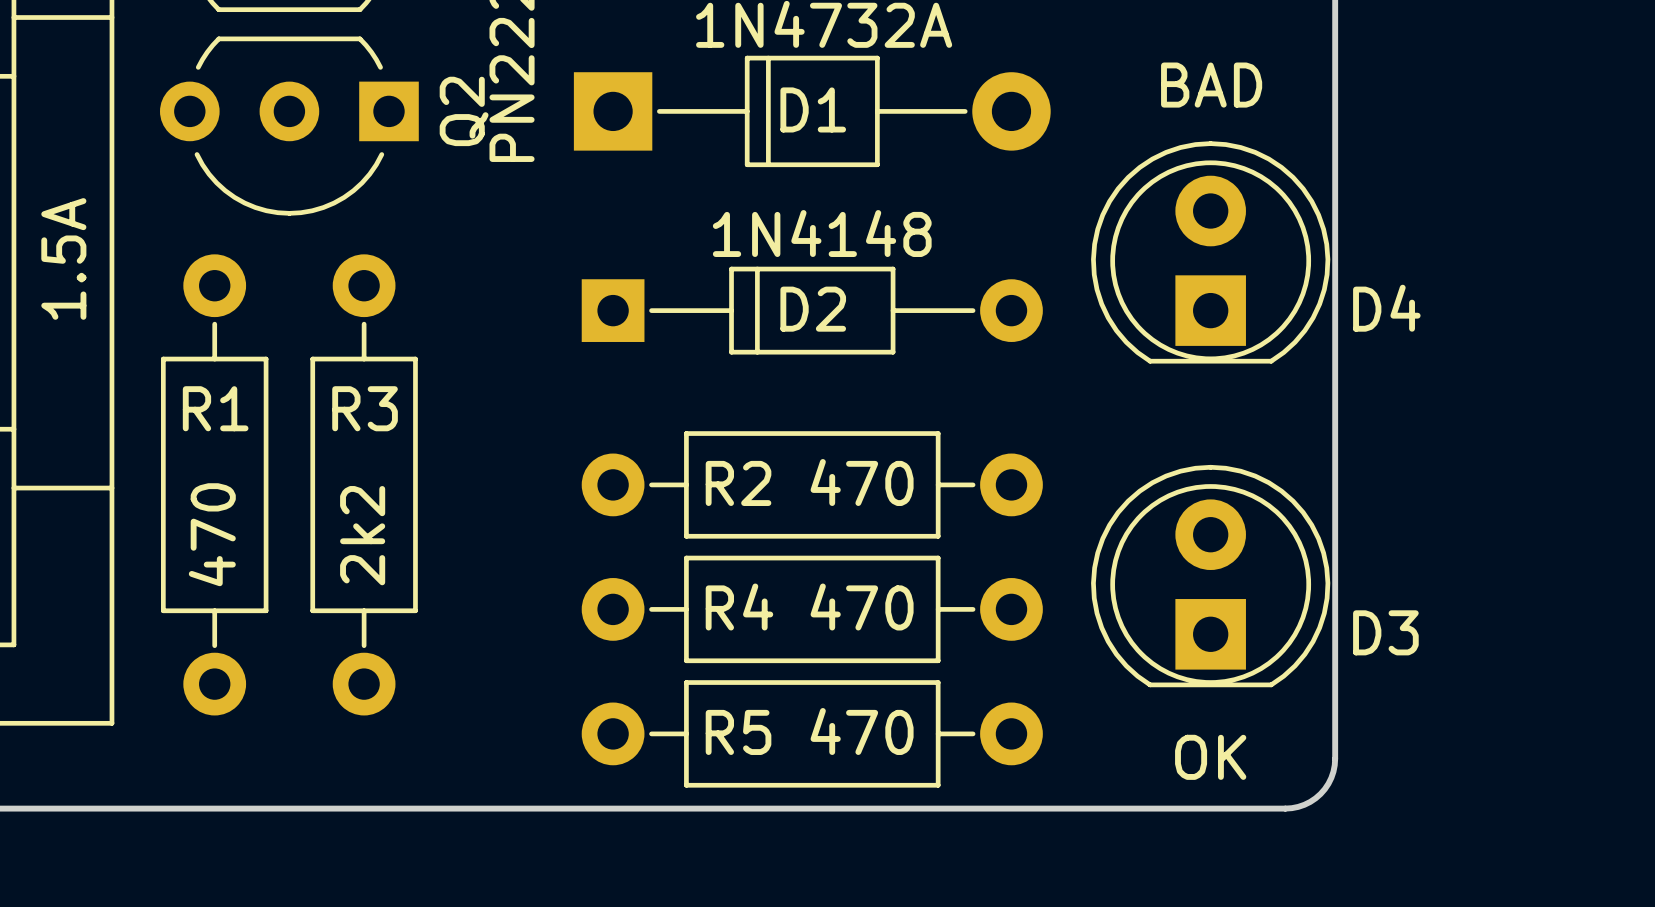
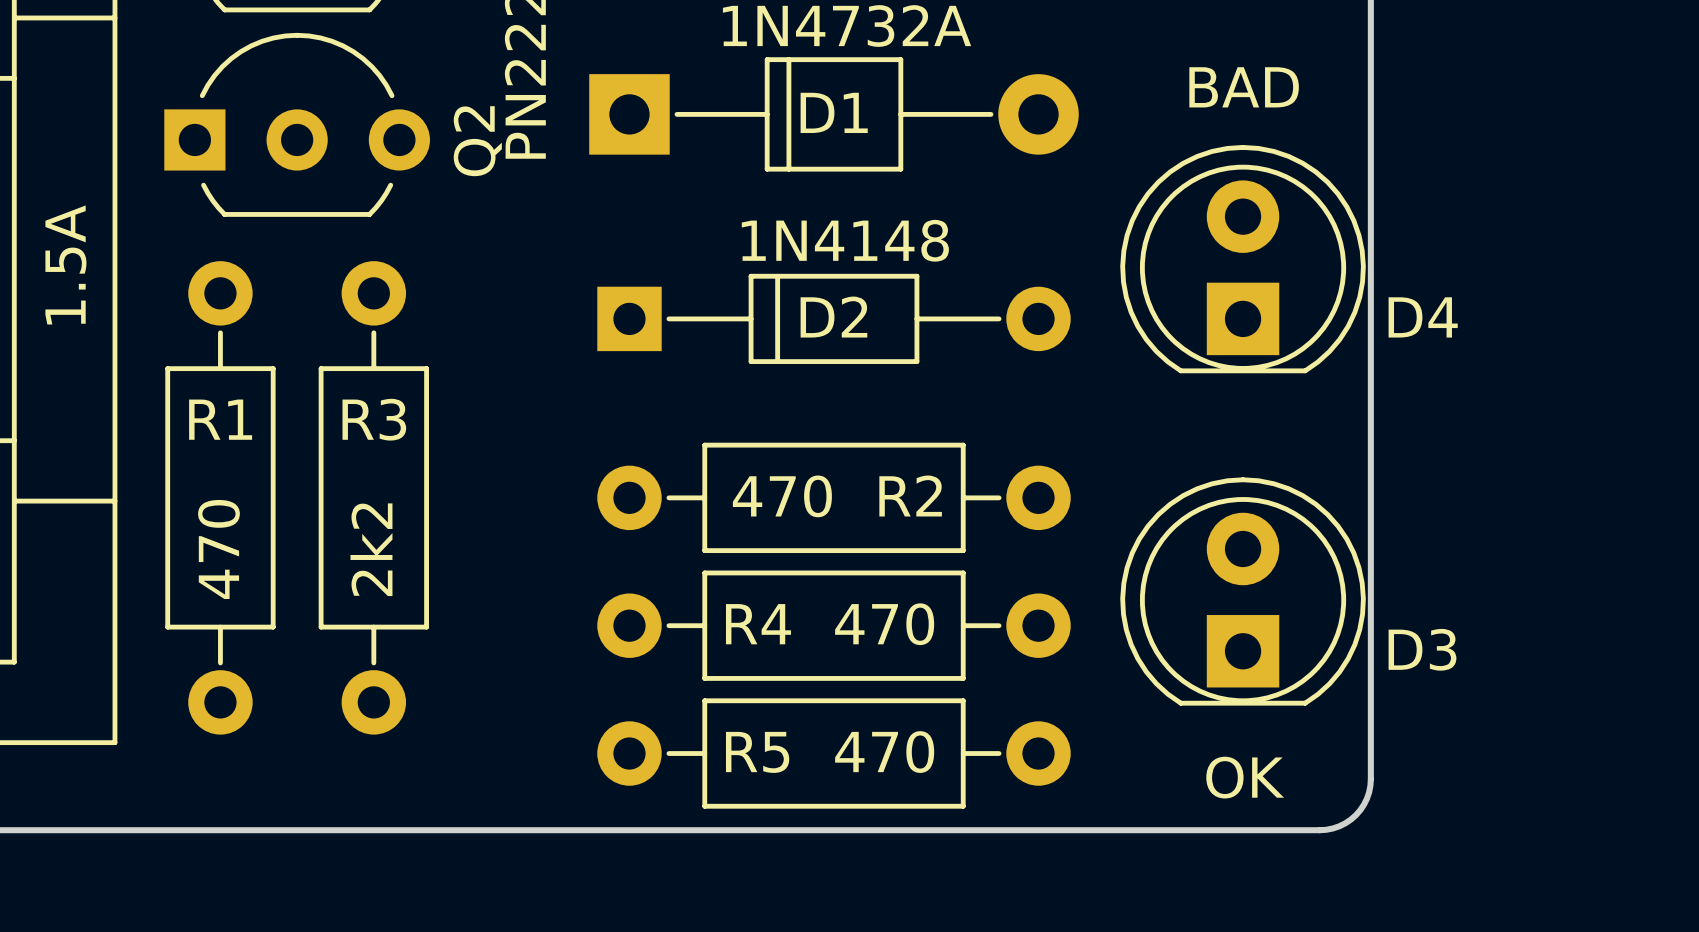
Q2 rotation: 0° (289, 126) -> 180° (297, 124)
R2 value position: 470 (862, 482) -> 470 (782, 496)
R2 name position: R2 (738, 483) -> R2 (910, 496)

